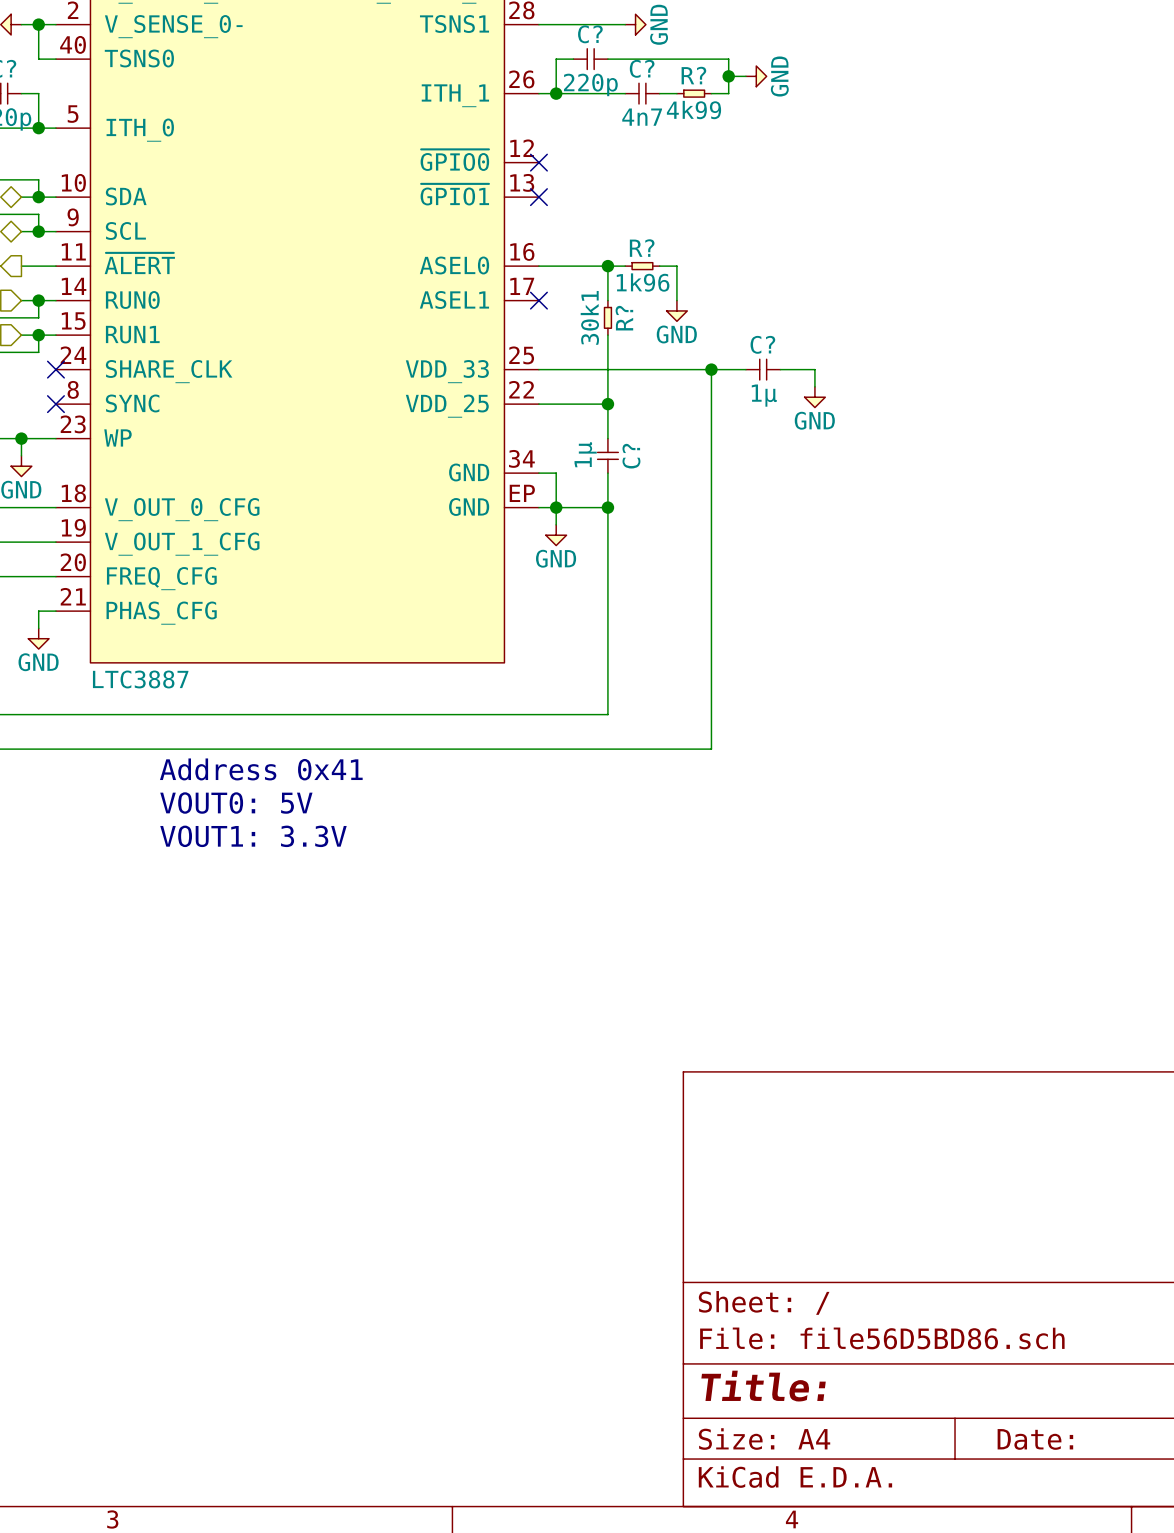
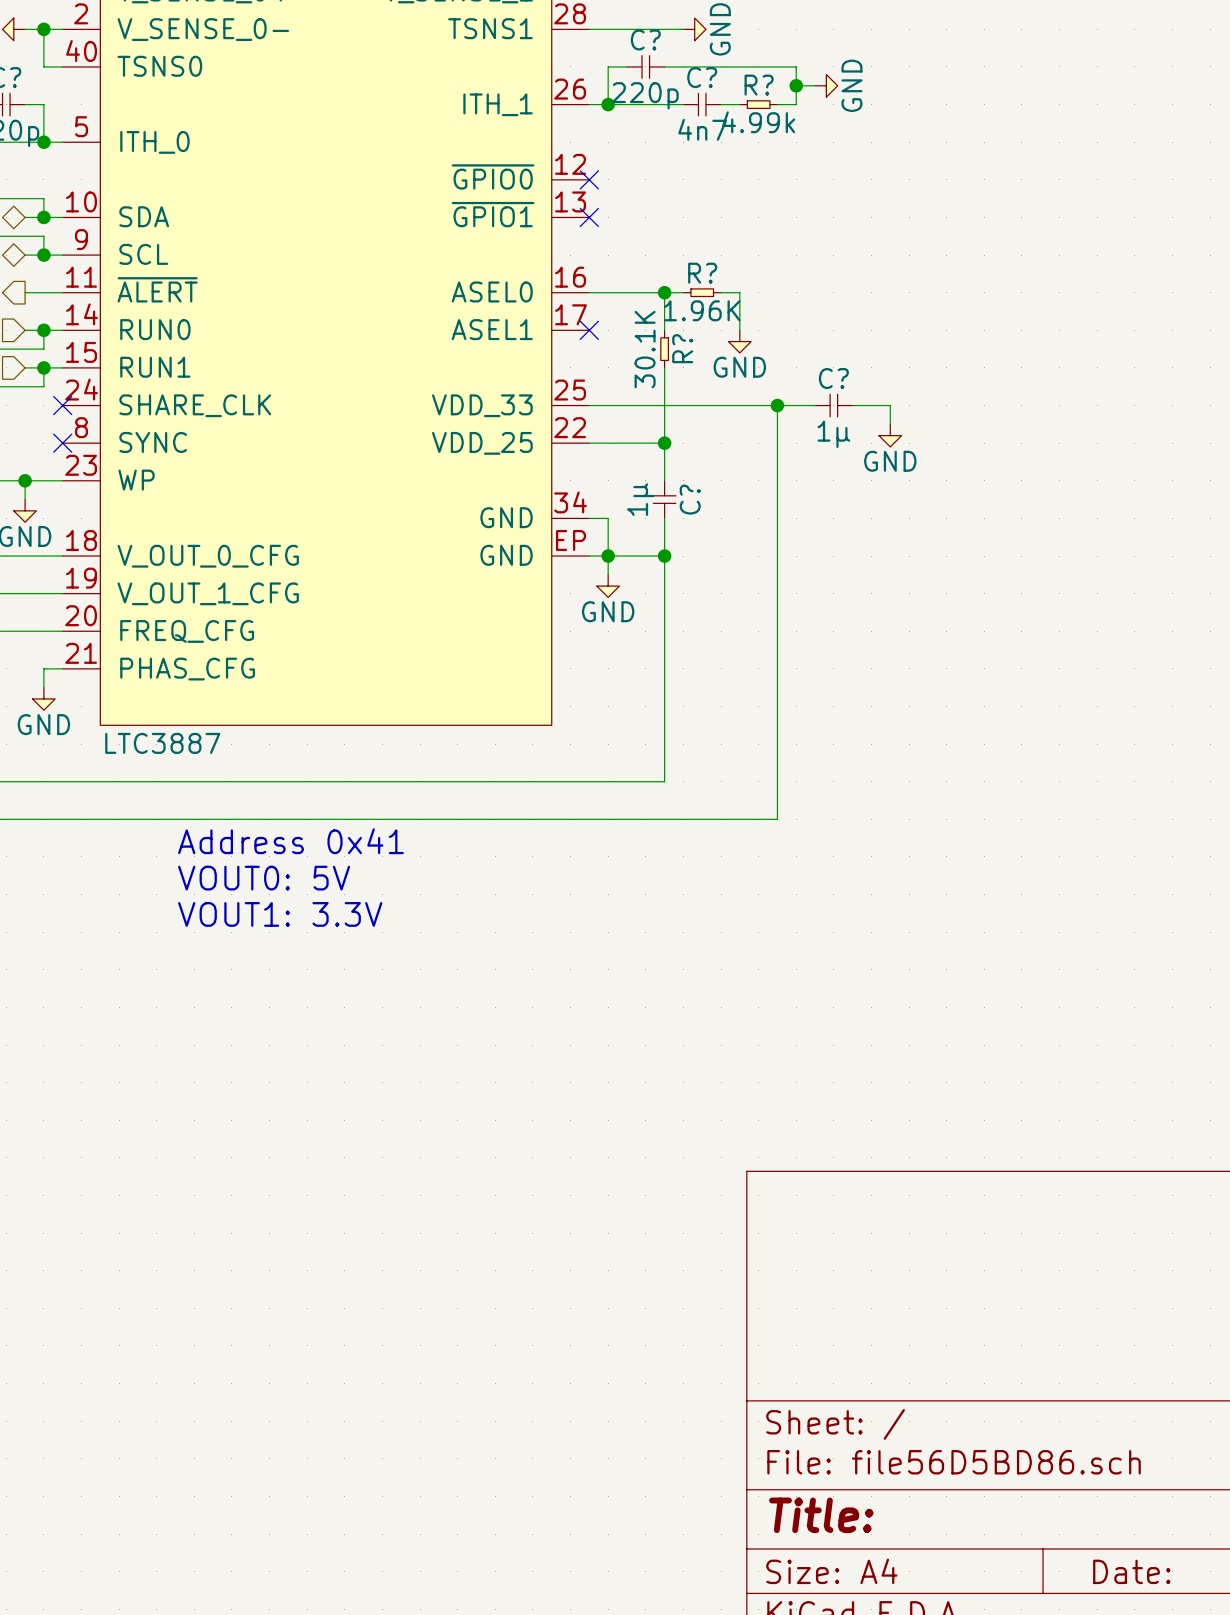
R? value: 4k99 (693, 110) -> 4.99k (758, 122)
R? value: 1k96 (643, 282) -> 1.96K (702, 310)
R? value: 30k1 (589, 317) -> 30.1K (645, 349)

